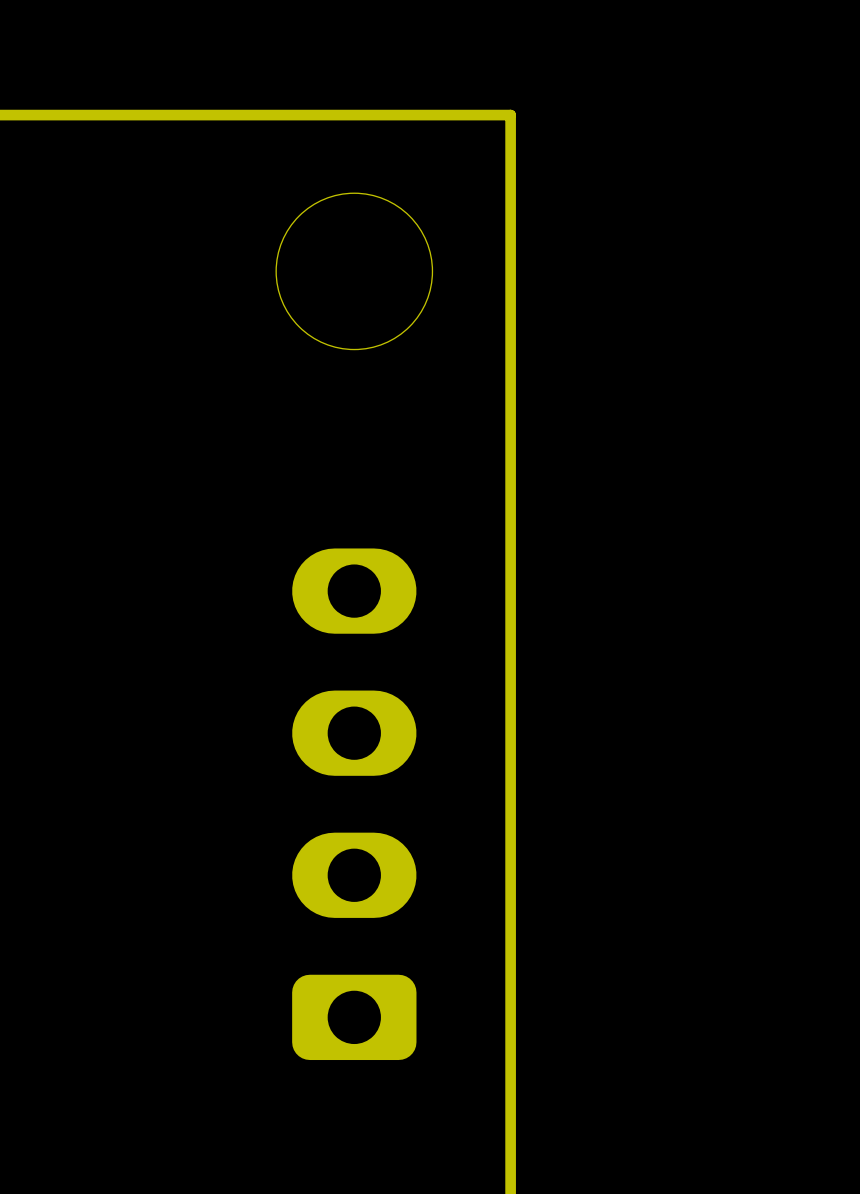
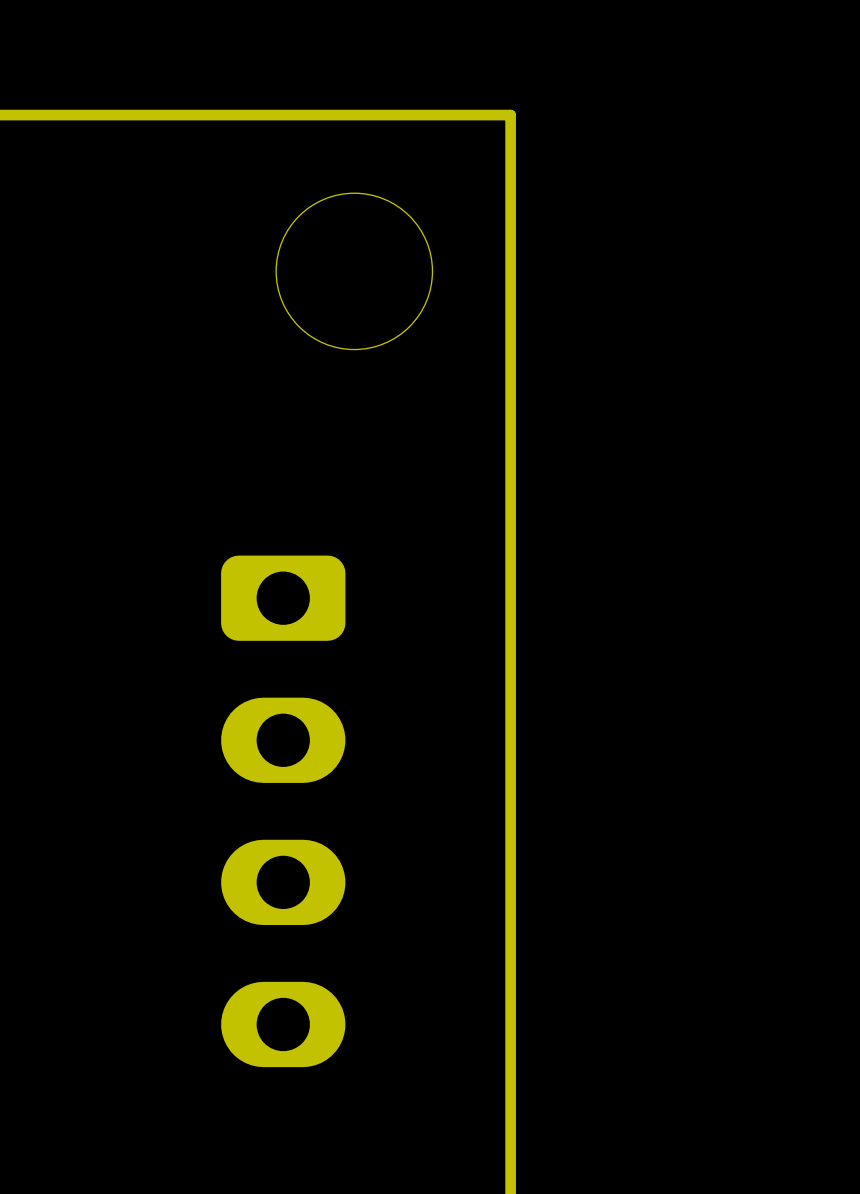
part rotation: 0° (354, 804) -> 180° (283, 811)

